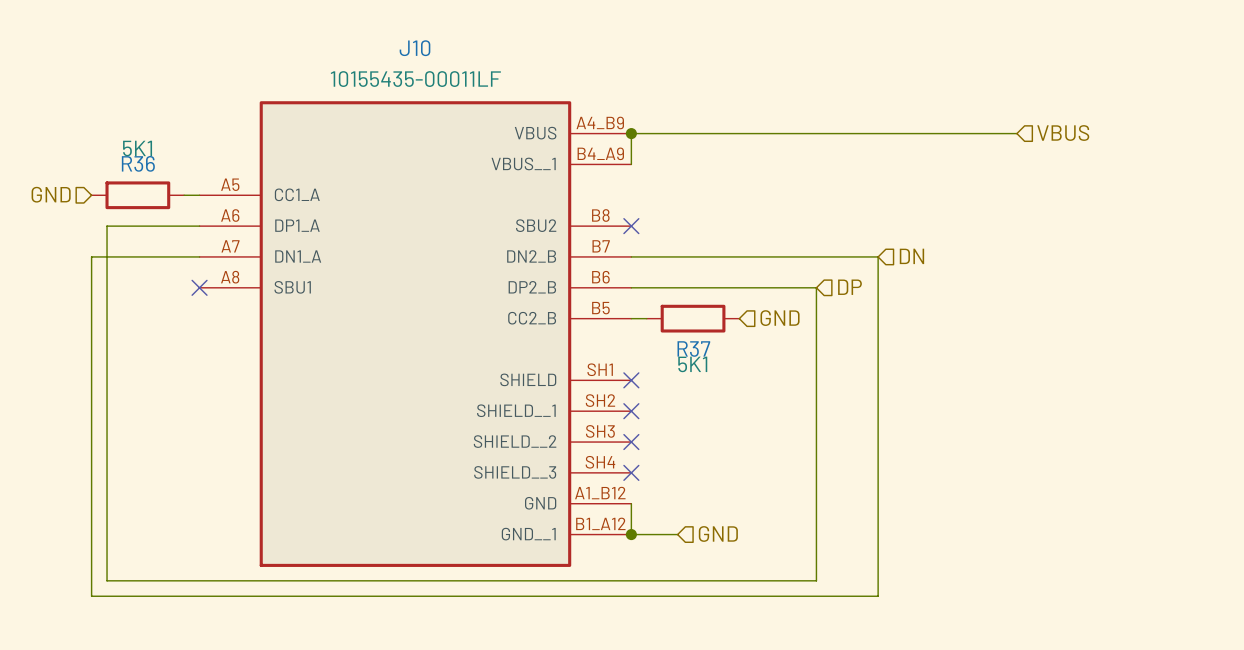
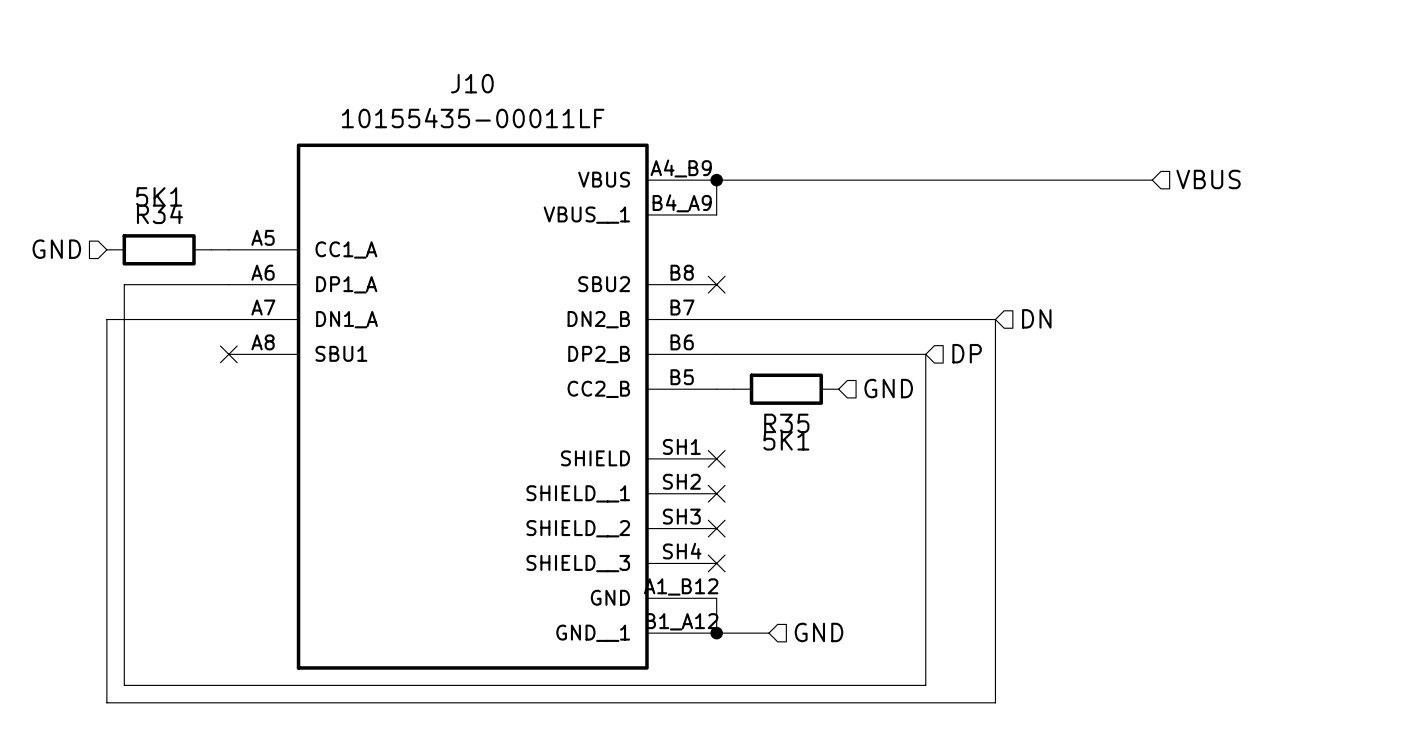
R36 name: R36 (138, 163) -> R34 (159, 213)
R37 name: R37 (693, 349) -> R35 (786, 423)

